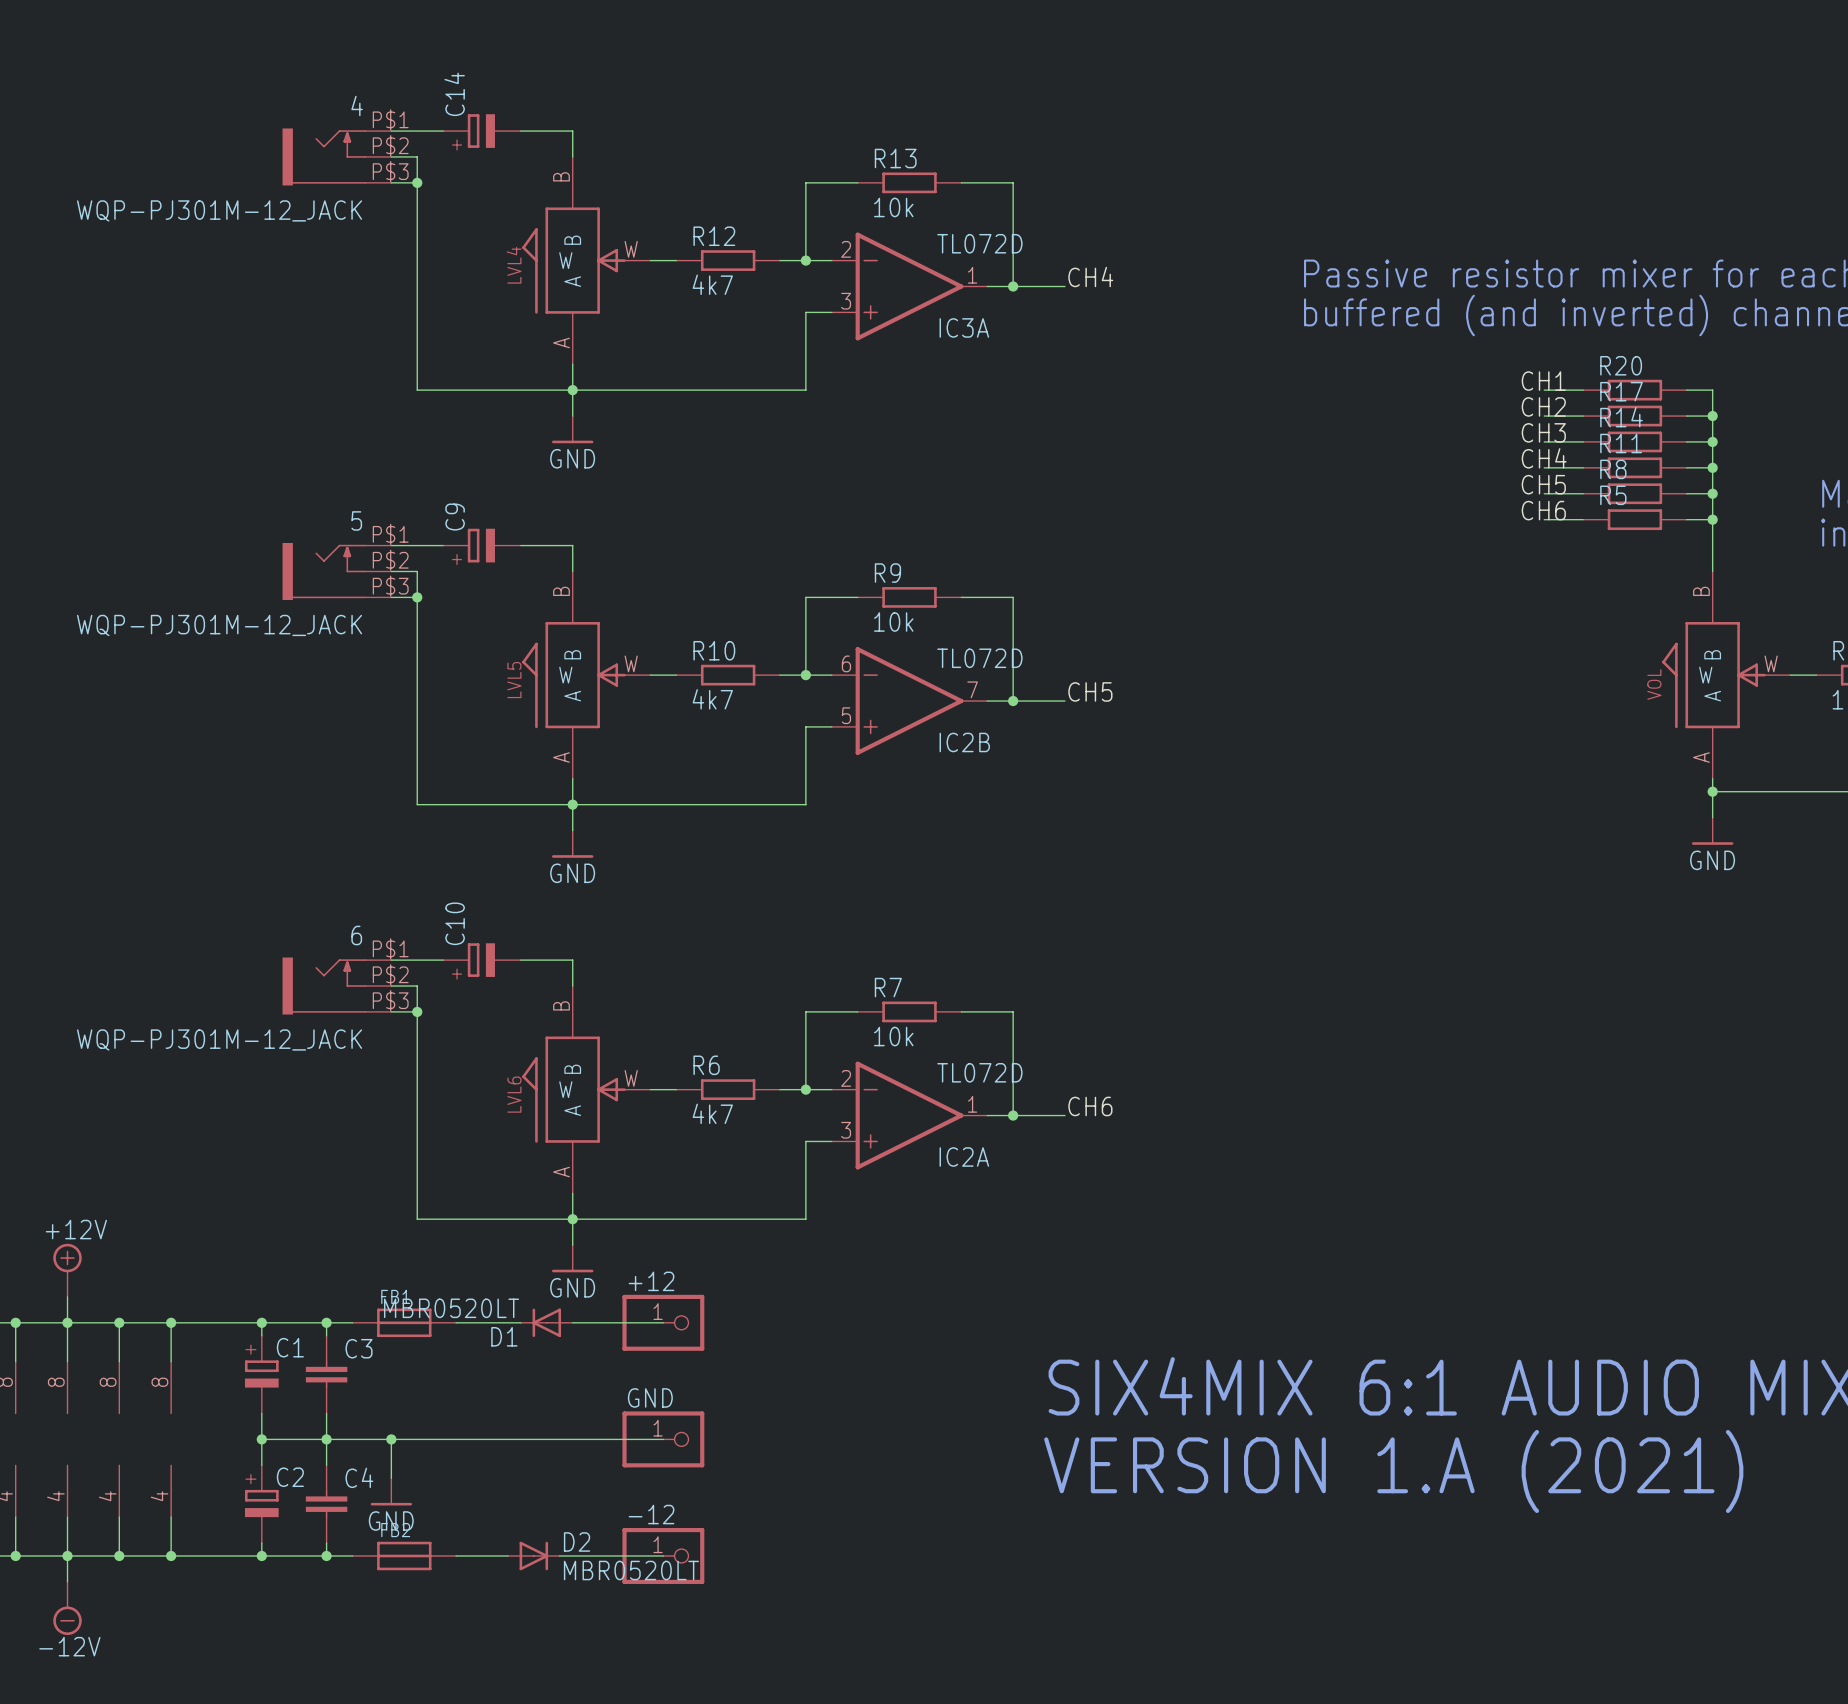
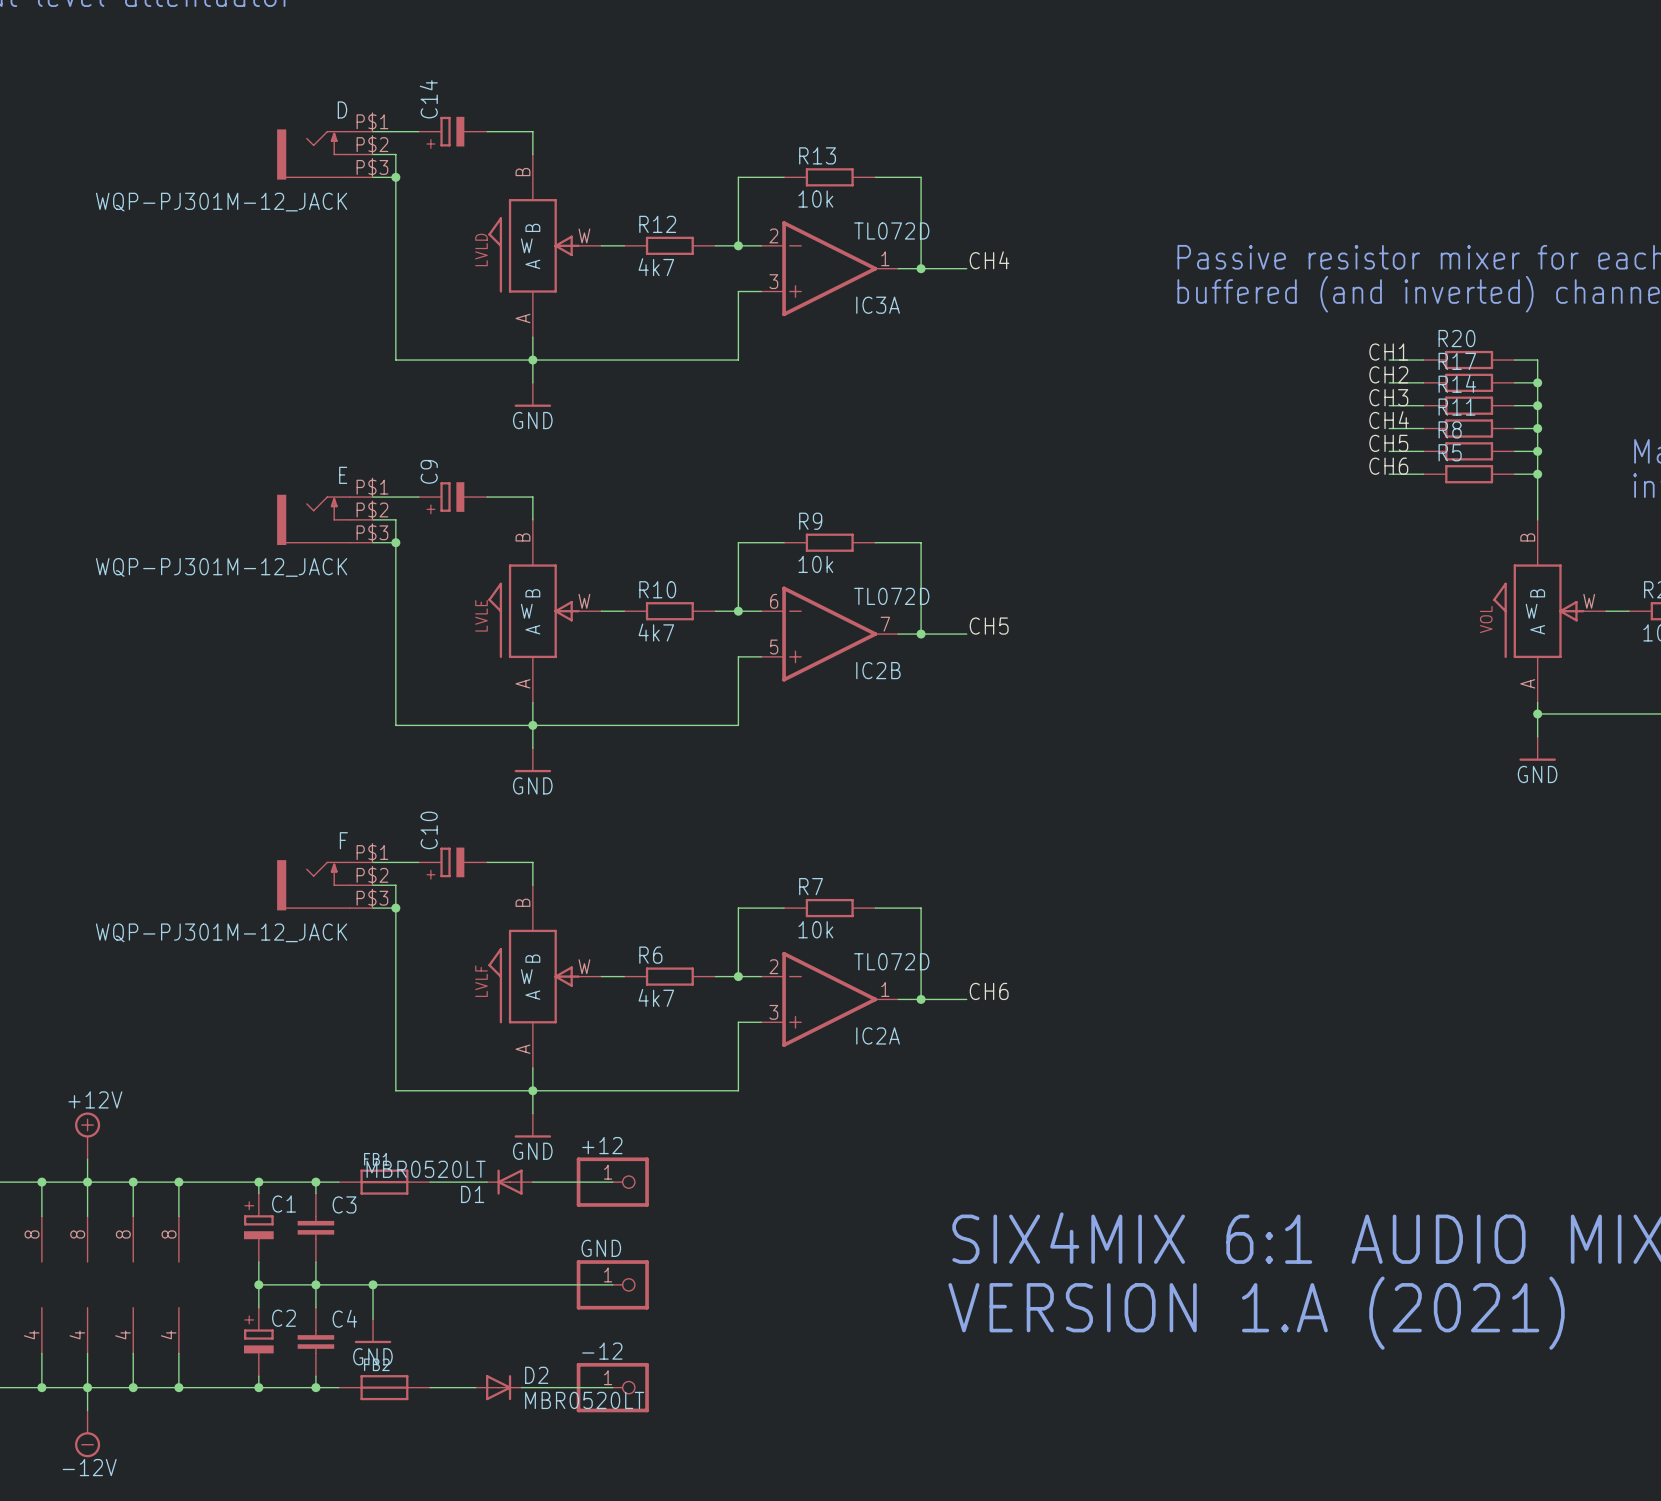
4 name: 4 (357, 106) -> D (342, 109)
LVL4 name: LVL4 (514, 265) -> LVLD (481, 249)
5 name: 5 (356, 520) -> E (343, 475)
LVL5 name: LVL5 (514, 680) -> LVLE (481, 615)
6 name: 6 (356, 935) -> F (343, 840)
LVL6 name: LVL6 (514, 1094) -> LVLF (481, 981)

